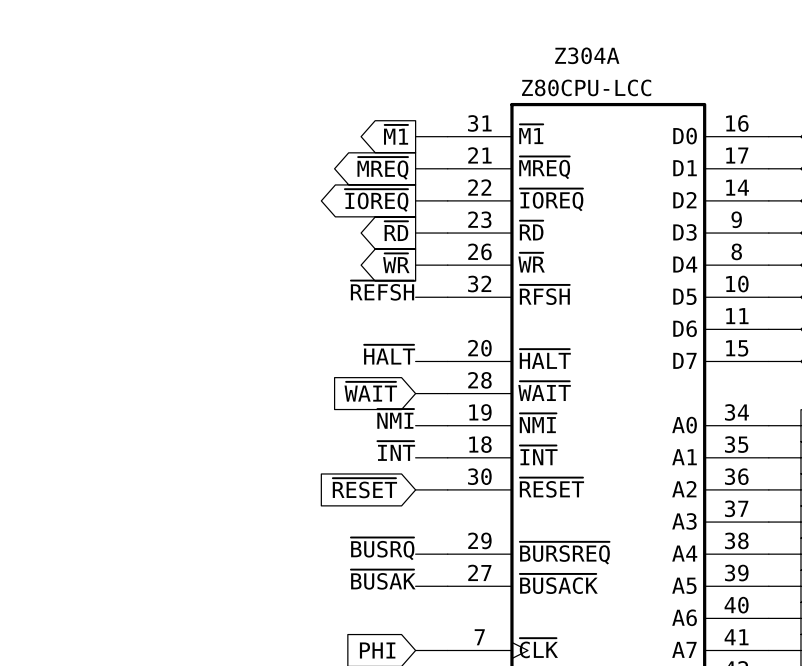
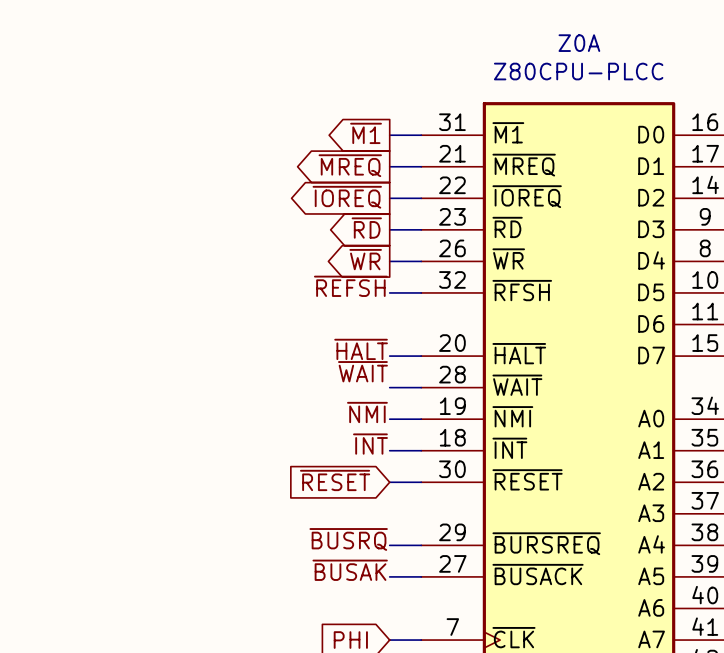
Z304A name: Z304A (587, 55) -> Z0A (579, 43)
Z304A value: Z80CPU-LCC (586, 87) -> Z80CPU-PLCC (578, 71)
label: none -> ~{WAIT} (362, 371)
global label: ~{WAIT} (370, 391) -> none

